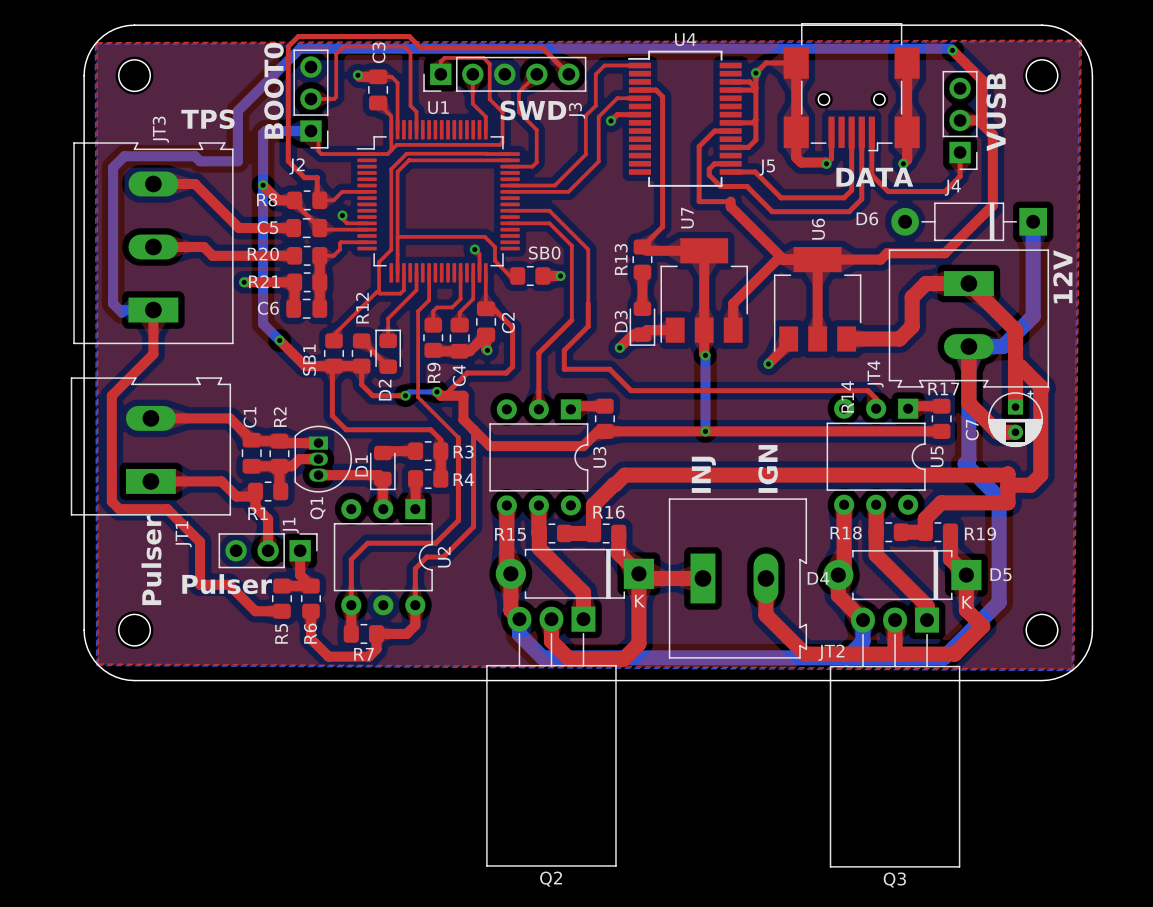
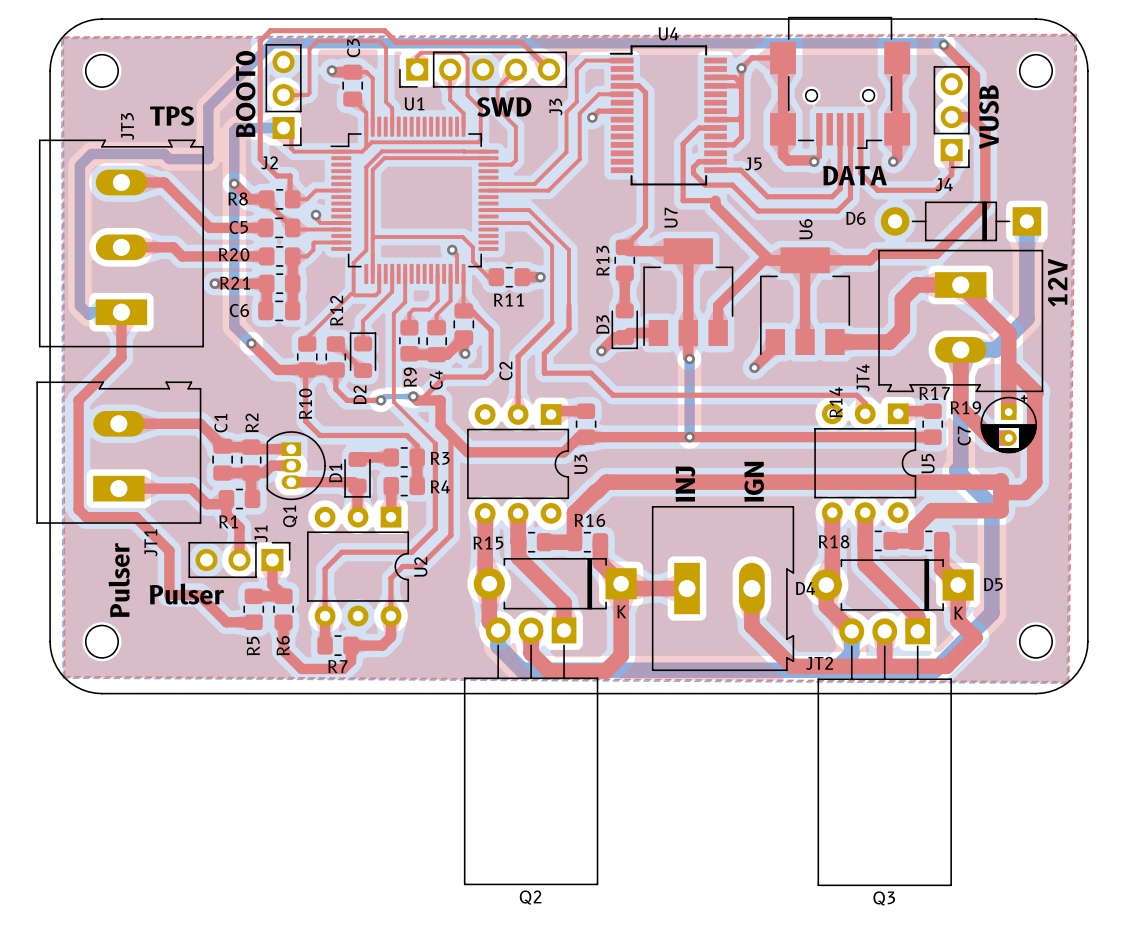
text: SB0 (544, 253) -> none
R11 name: none -> R11 (508, 300)
C2 name position: C2 (508, 323) -> C2 (505, 370)
text: SB1 (309, 360) -> none
R10 name: none -> R10 (305, 403)
R19 name position: R19 (980, 533) -> R19 (965, 407)

